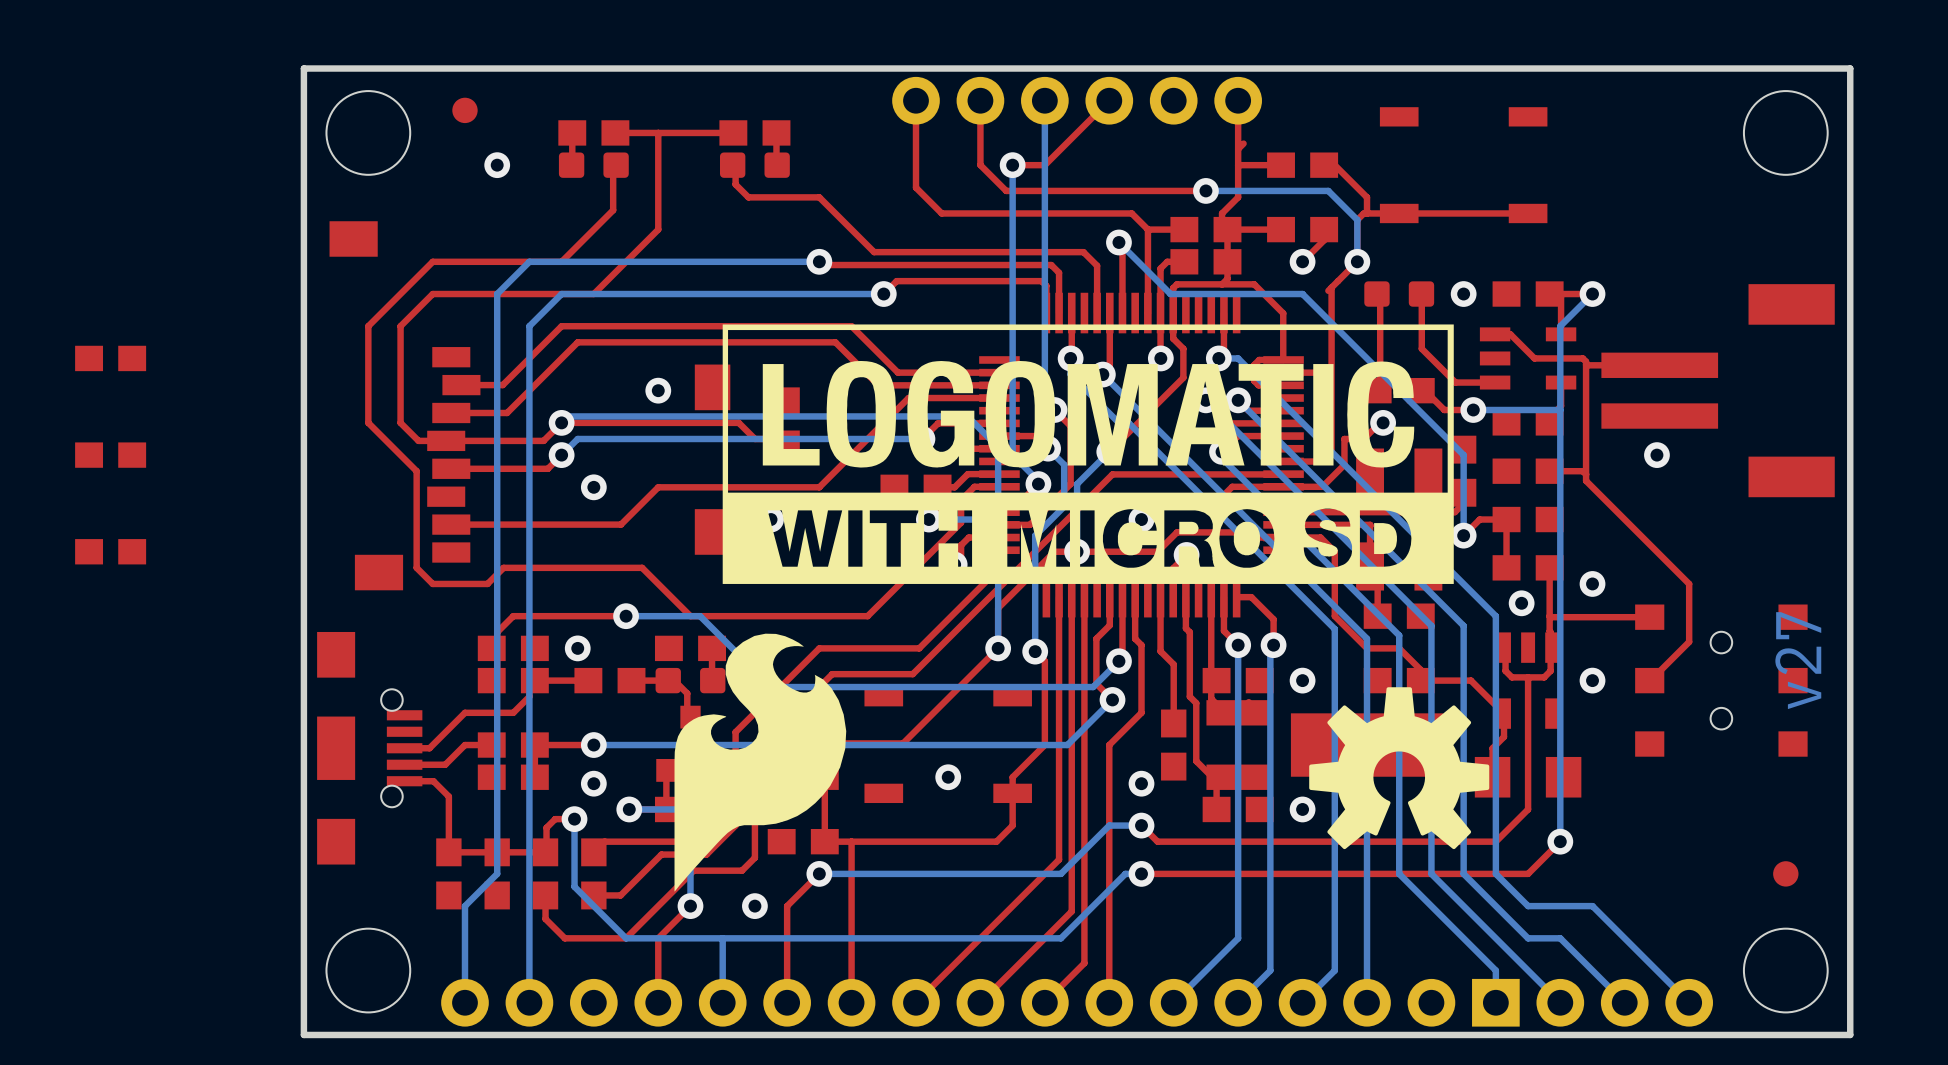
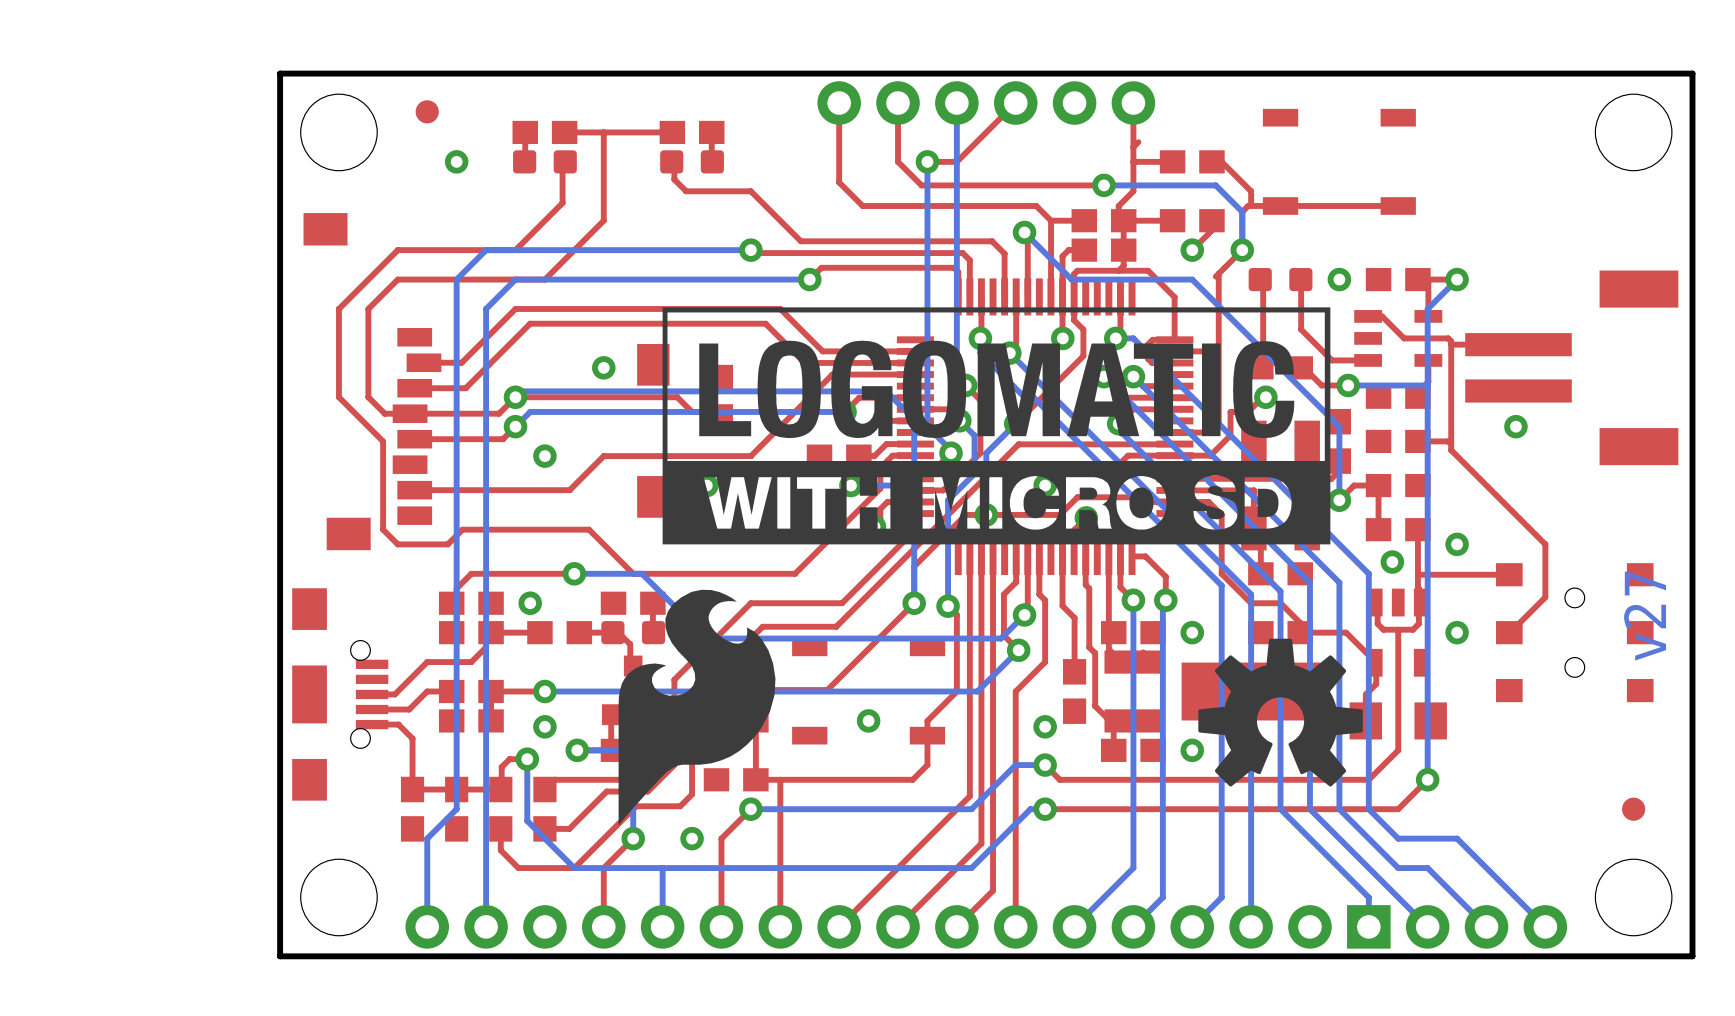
part: (110, 358) -> none
part: (110, 455) -> none
part: (110, 551) -> none

